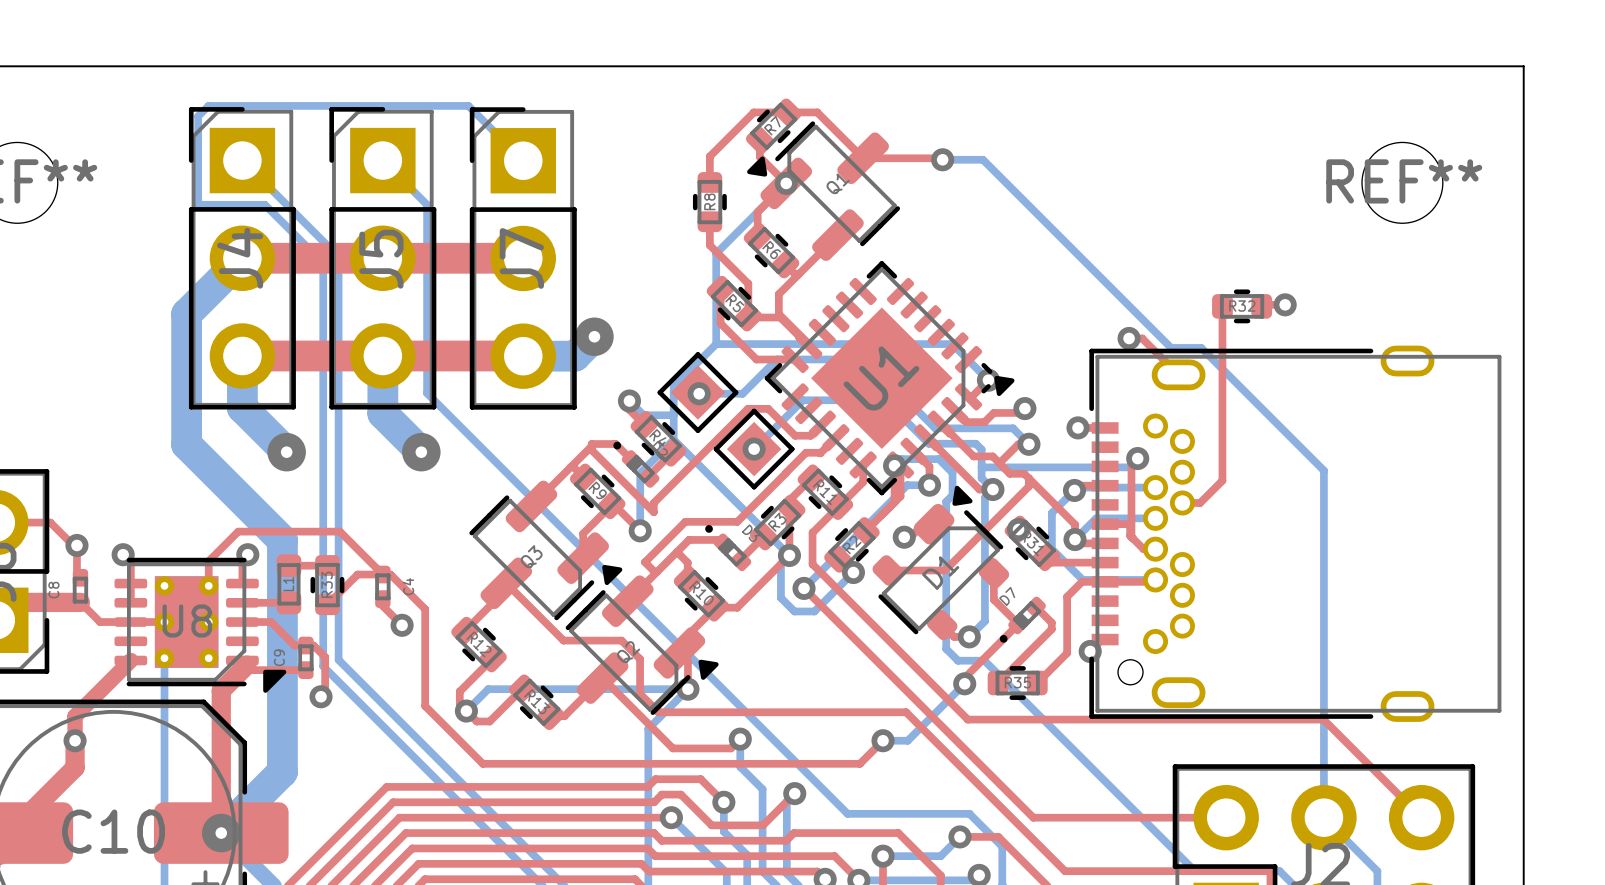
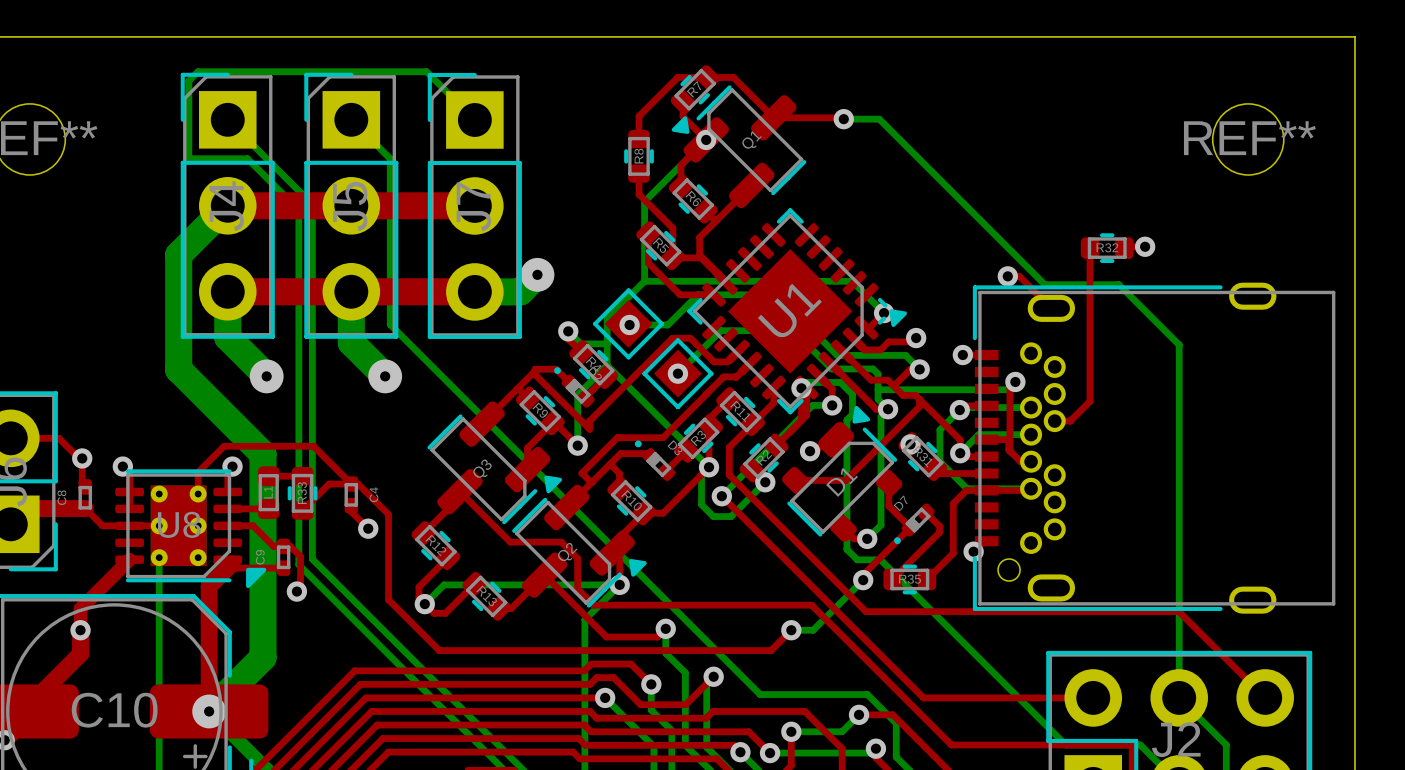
bottom track: (1201, 347) (1323, 470) -> (1071, 284) (1118, 284) (1179, 344) (1179, 392)

